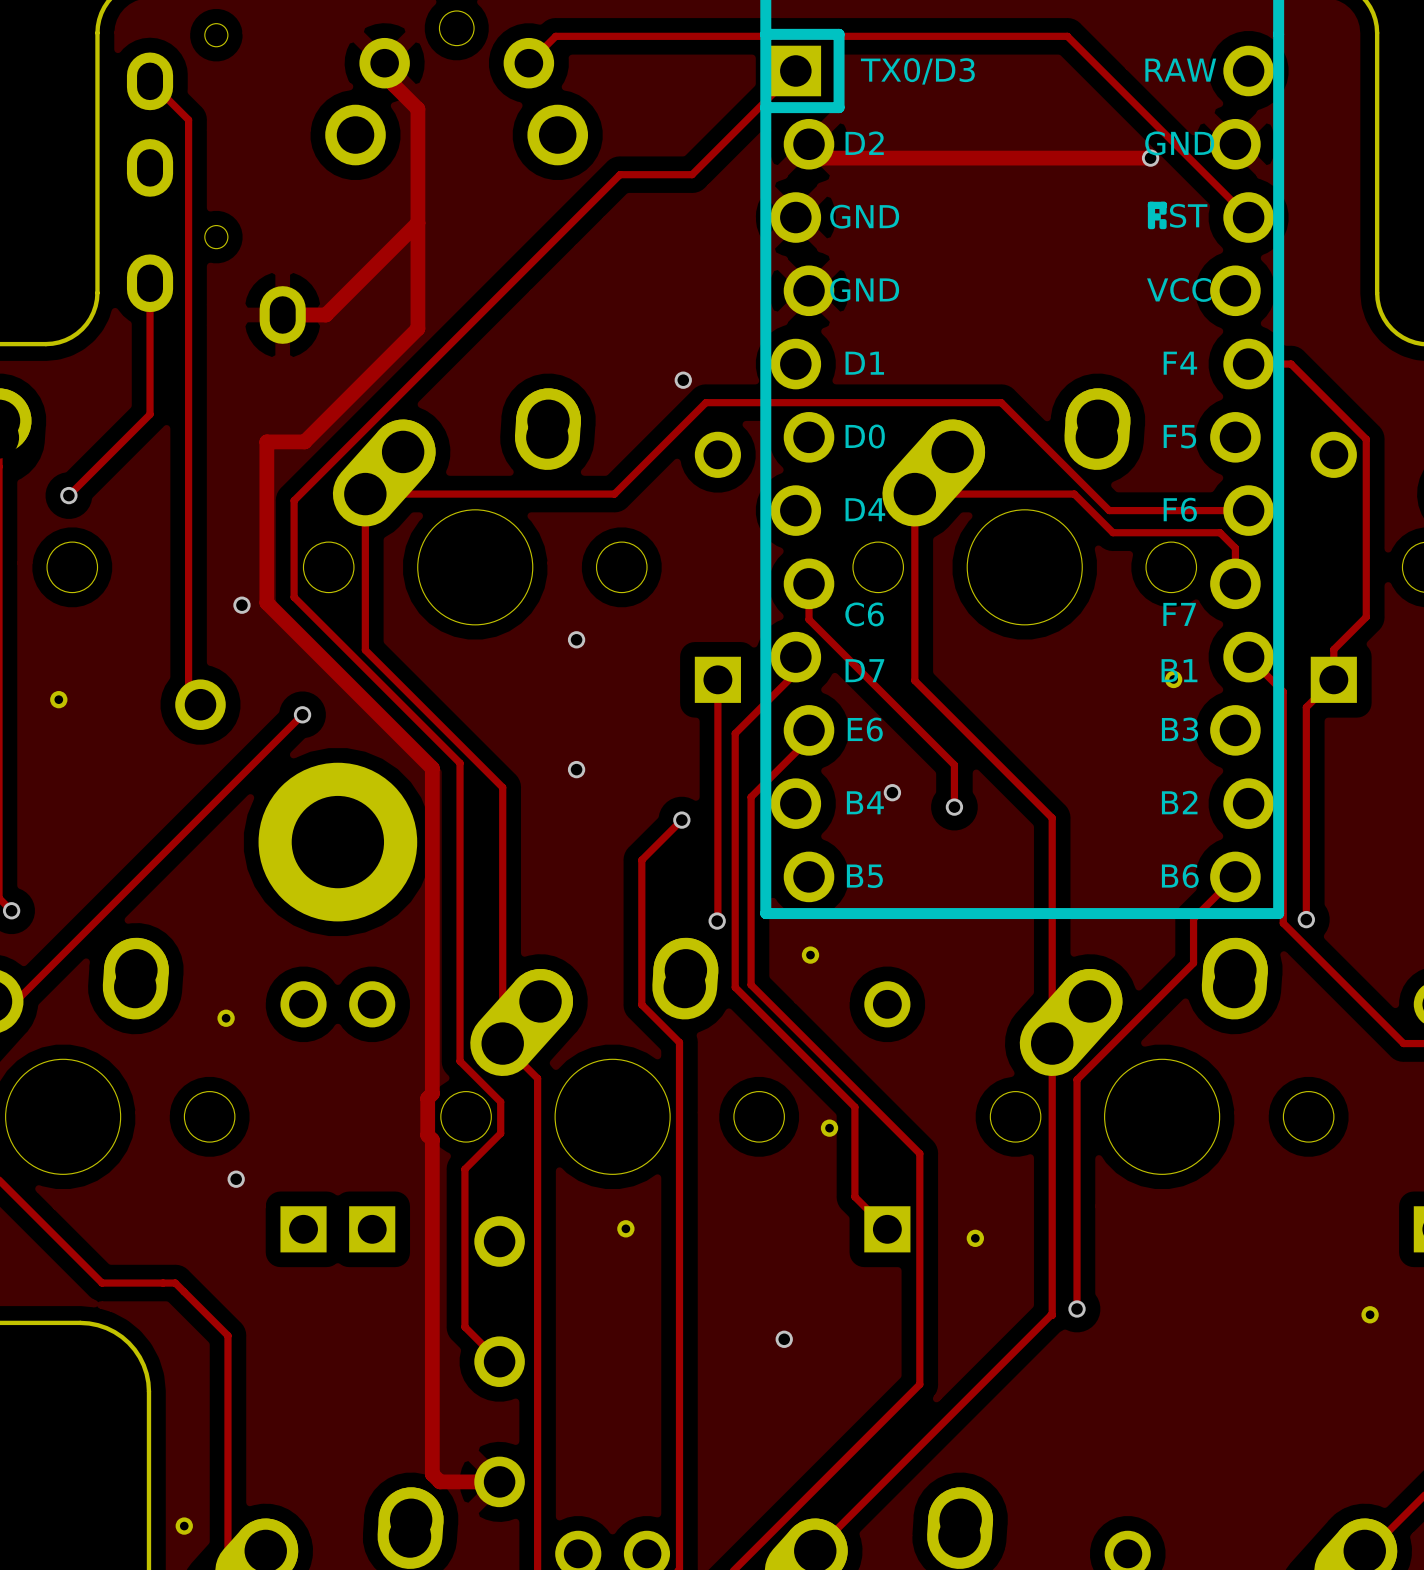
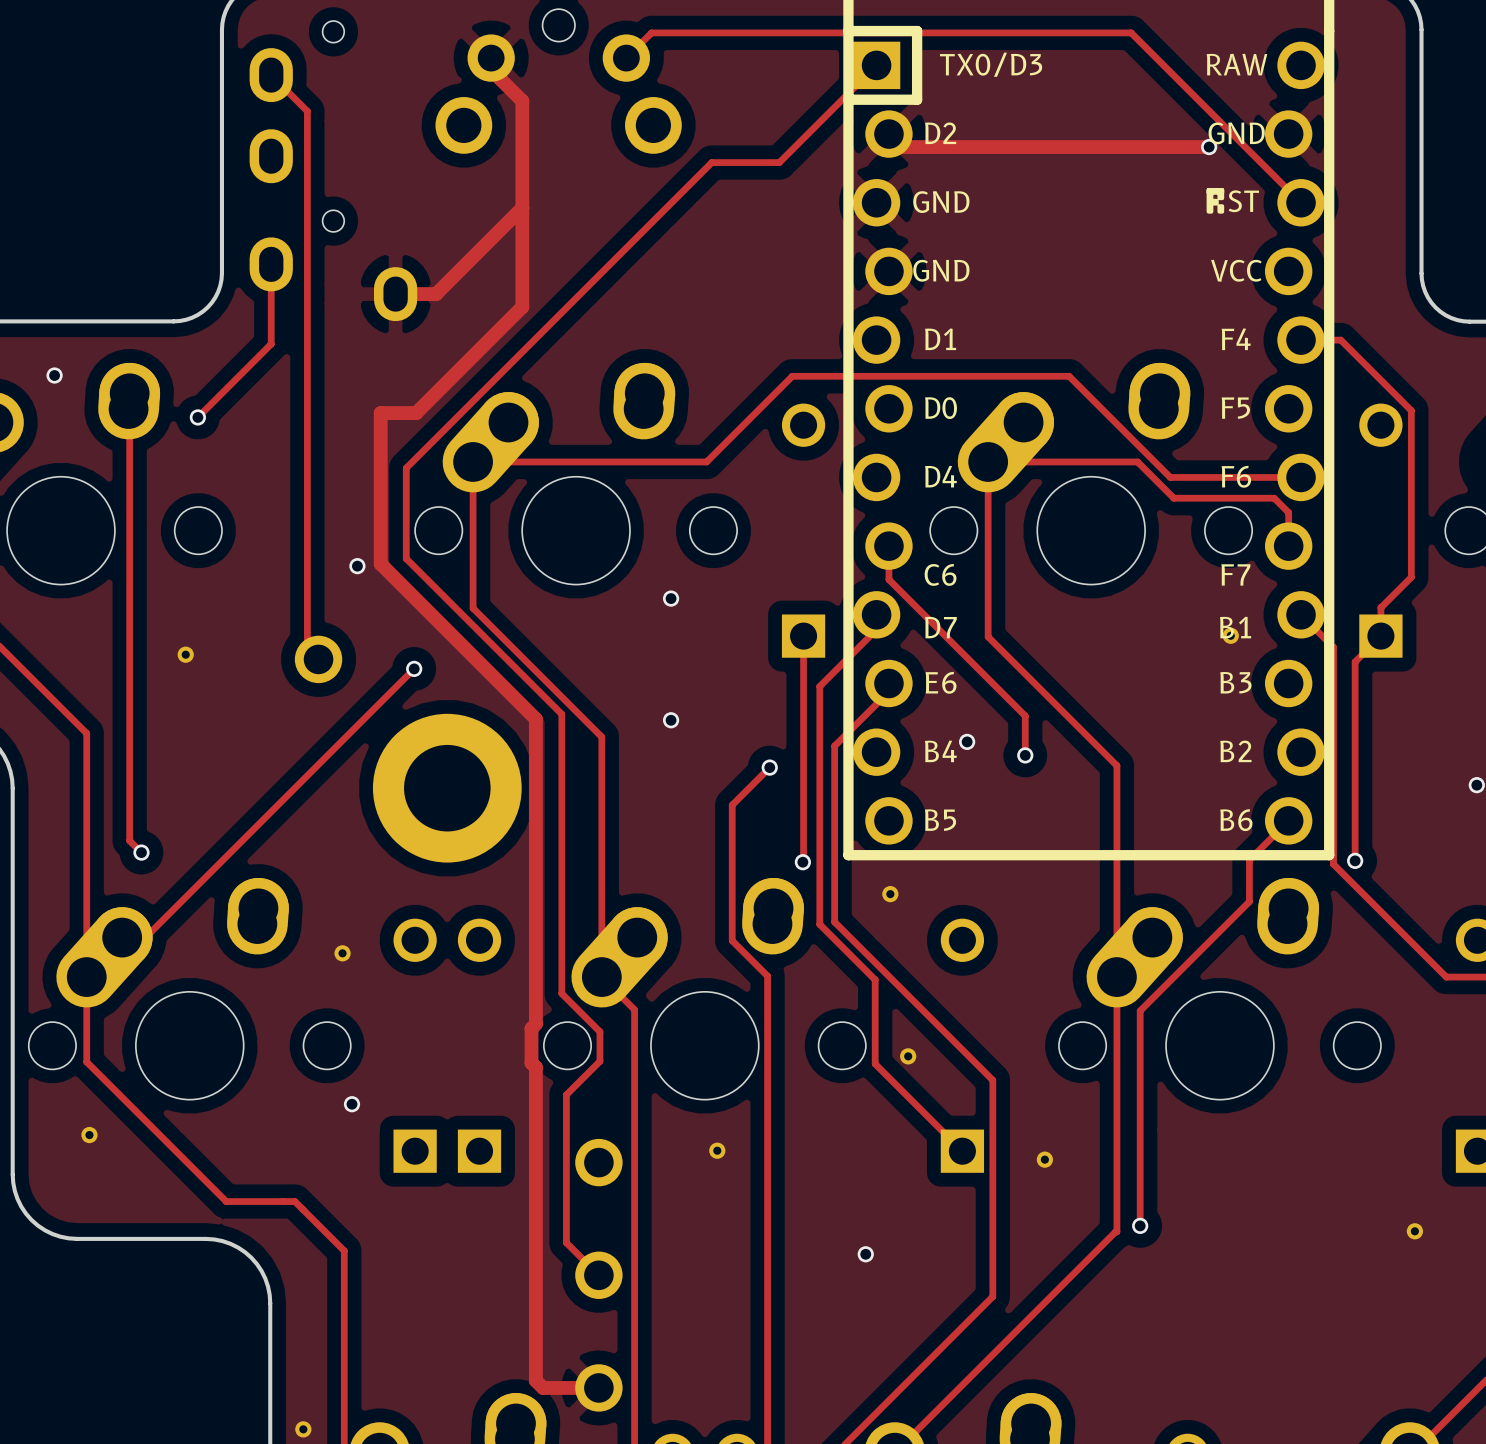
track: (150, 368) (150, 414) (68, 495) -> (271, 344) (197, 417)
via: (683, 380) -> none
via position: (68, 495) -> (197, 417)
track: (794, 1046) (854, 1107) (854, 1196) -> (875, 979) (875, 1064) (931, 1120)

